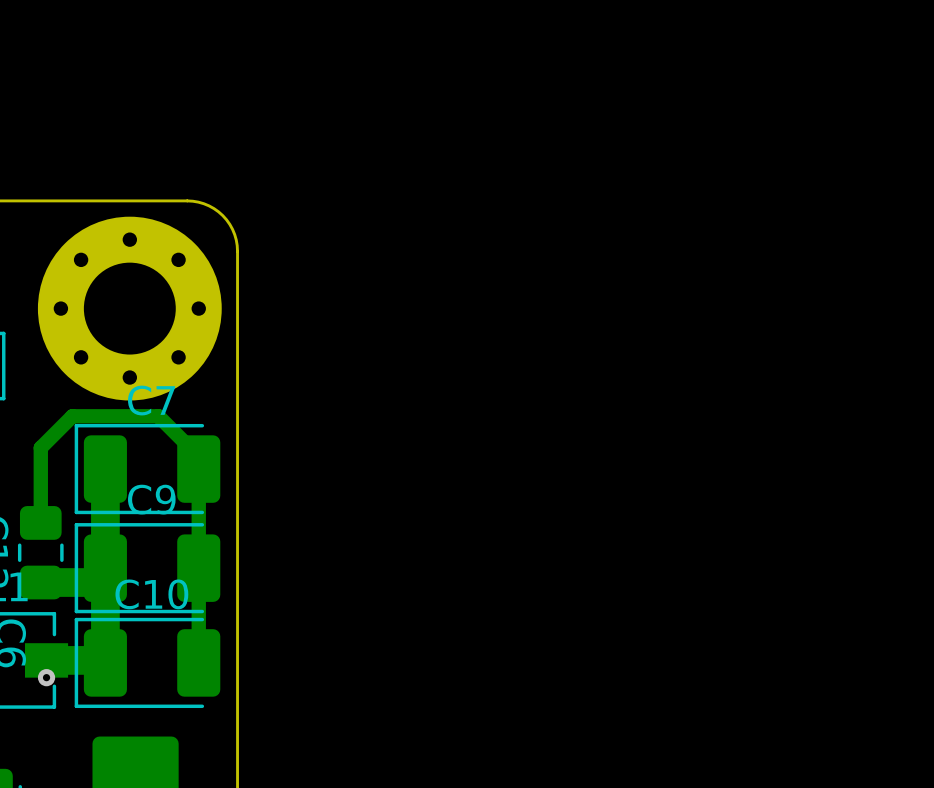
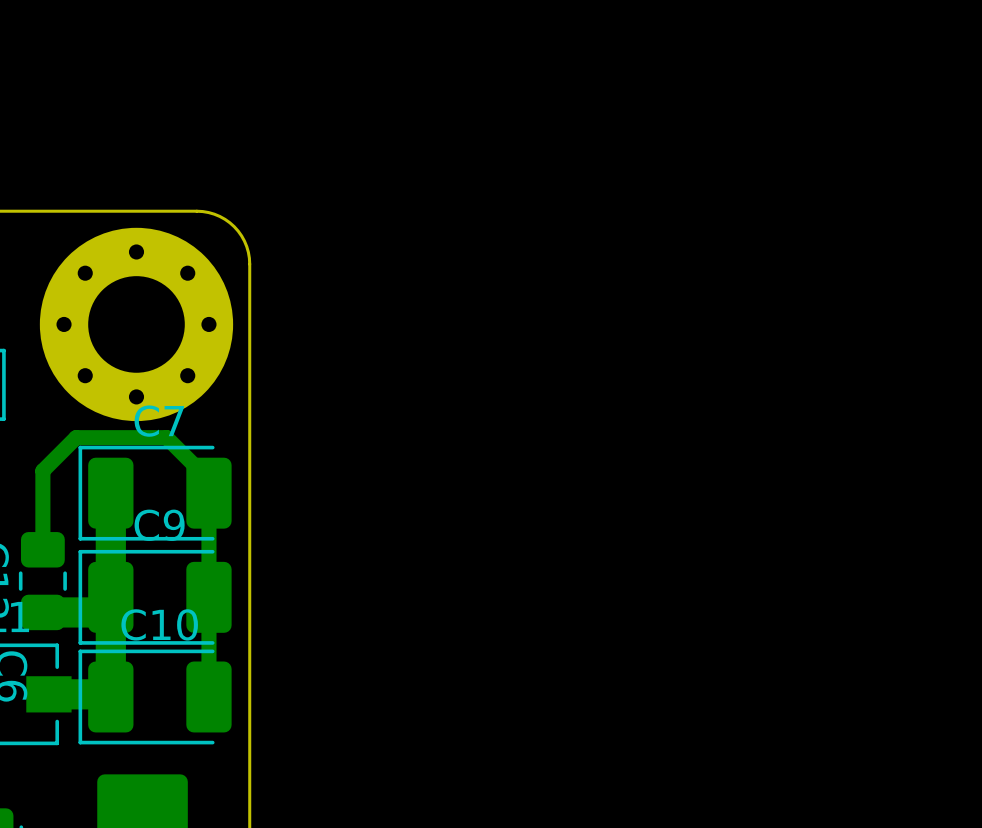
via: (46, 677) -> none

